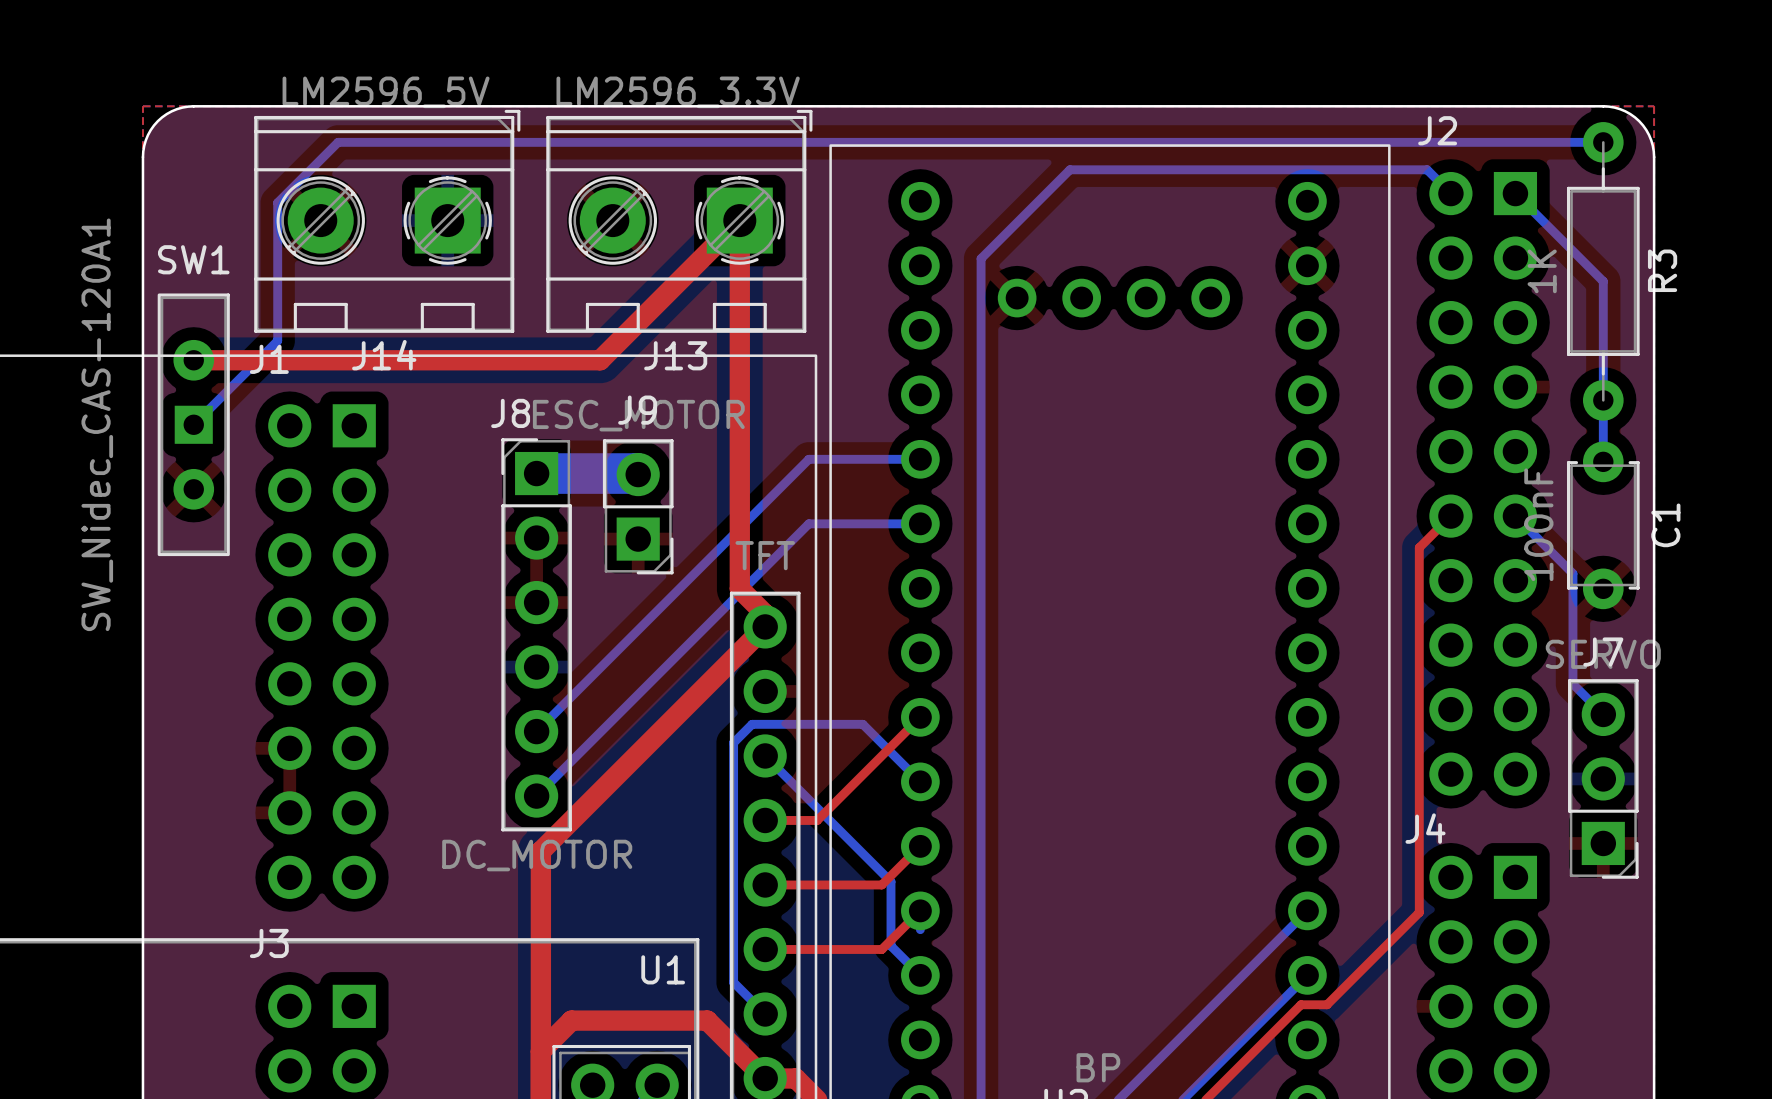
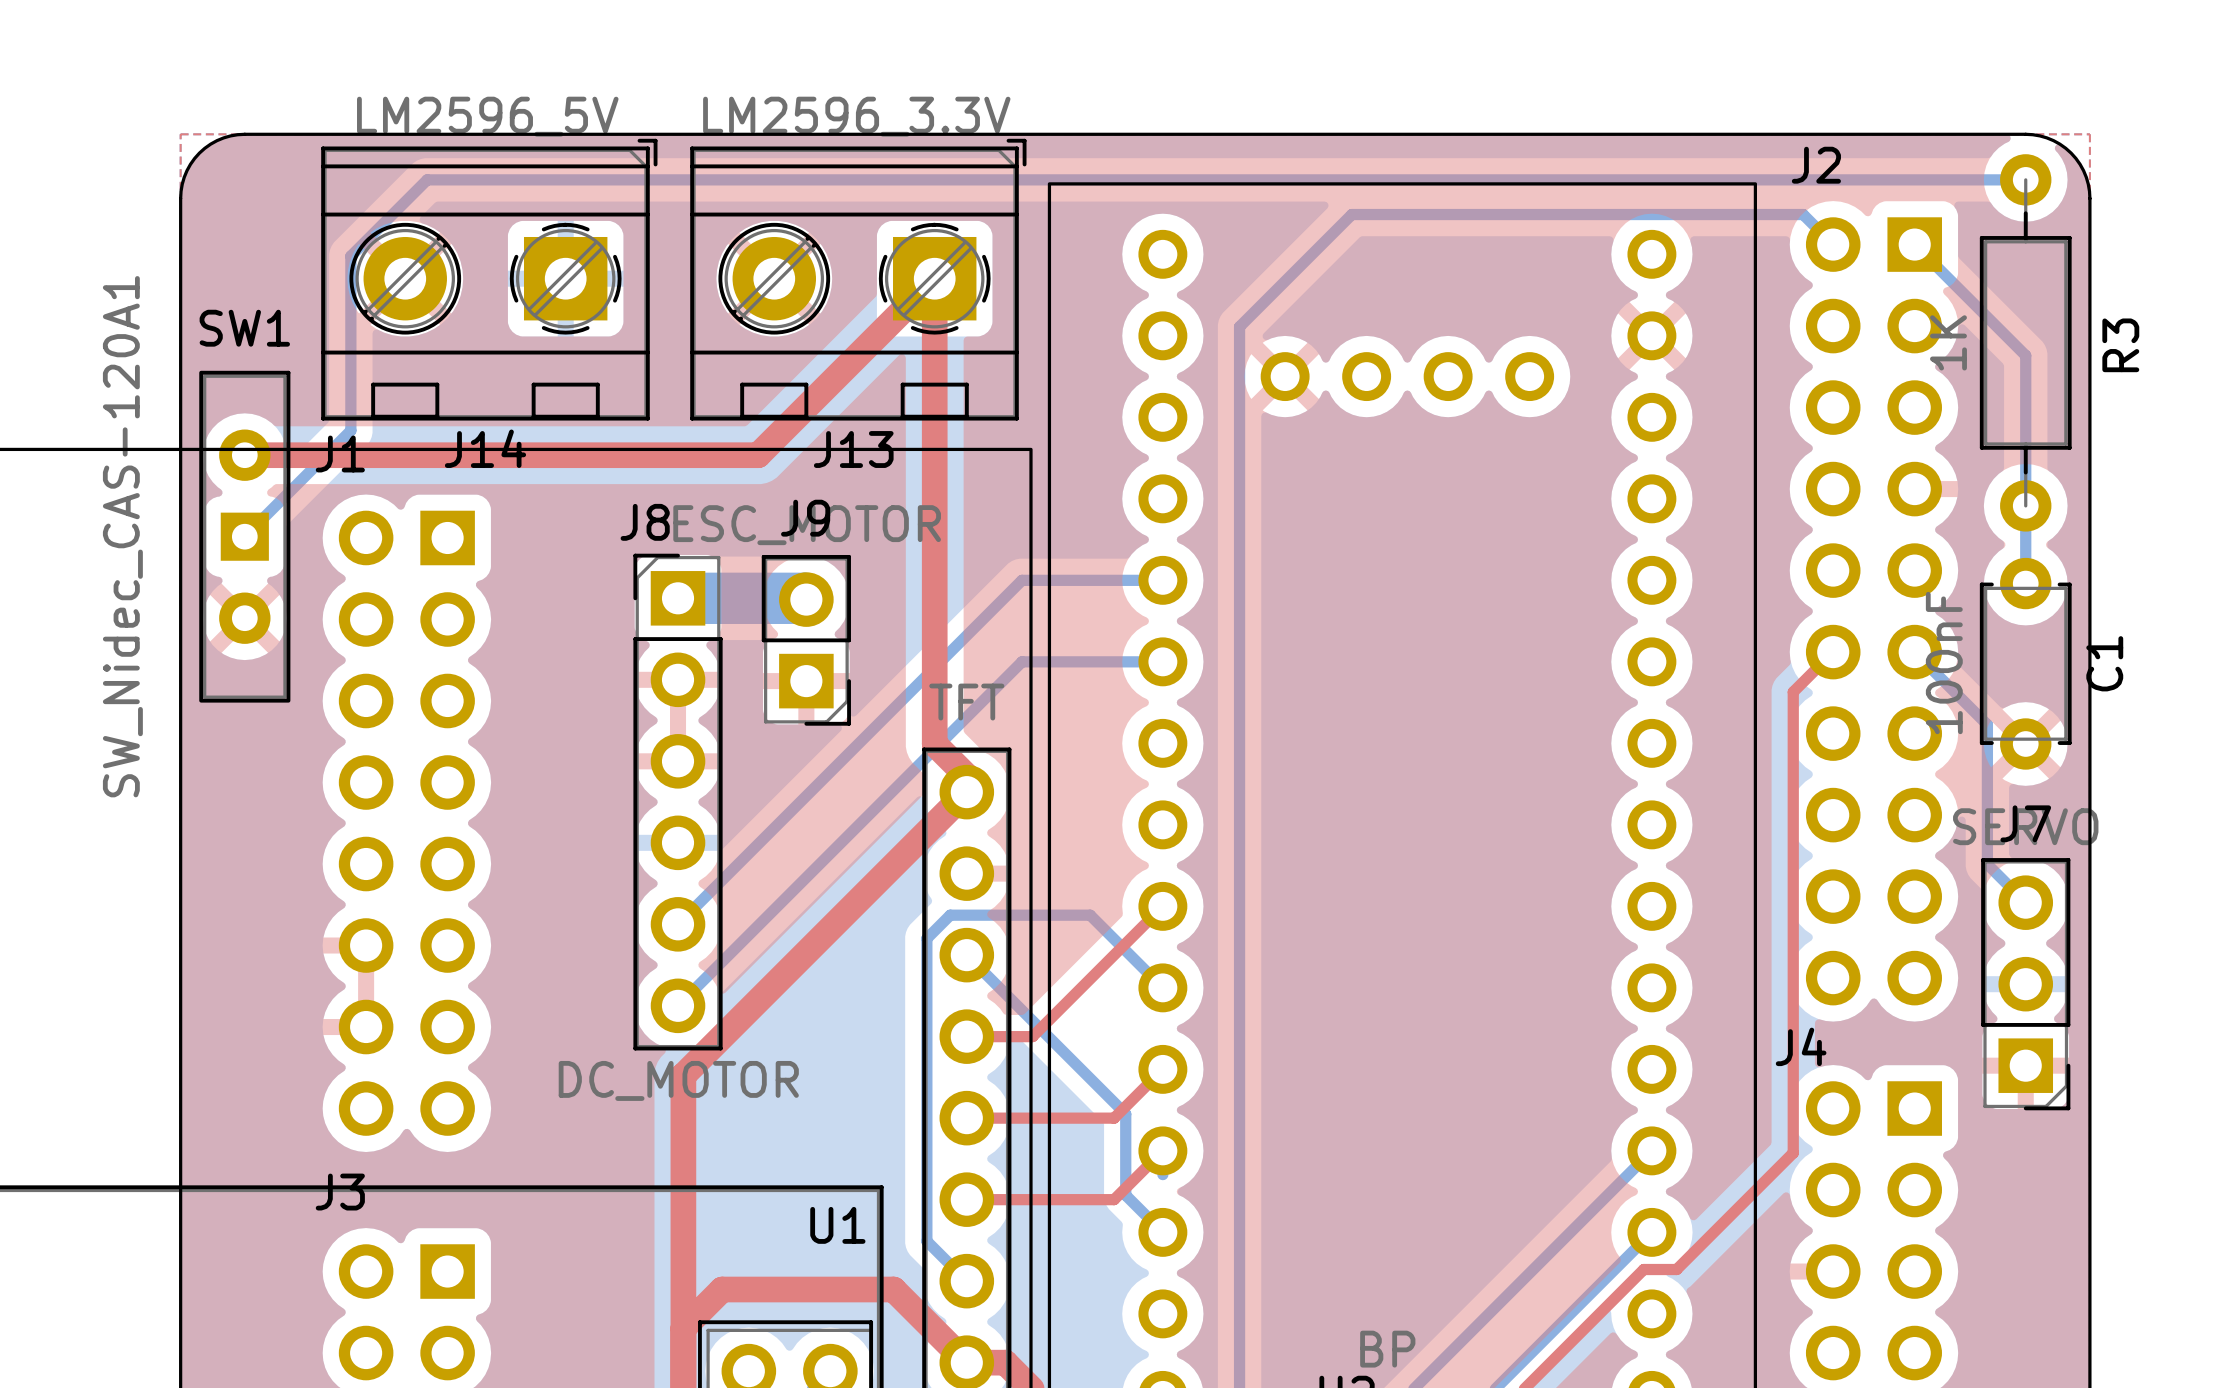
R3 name position: R3 (1662, 270) -> R3 (2120, 345)

